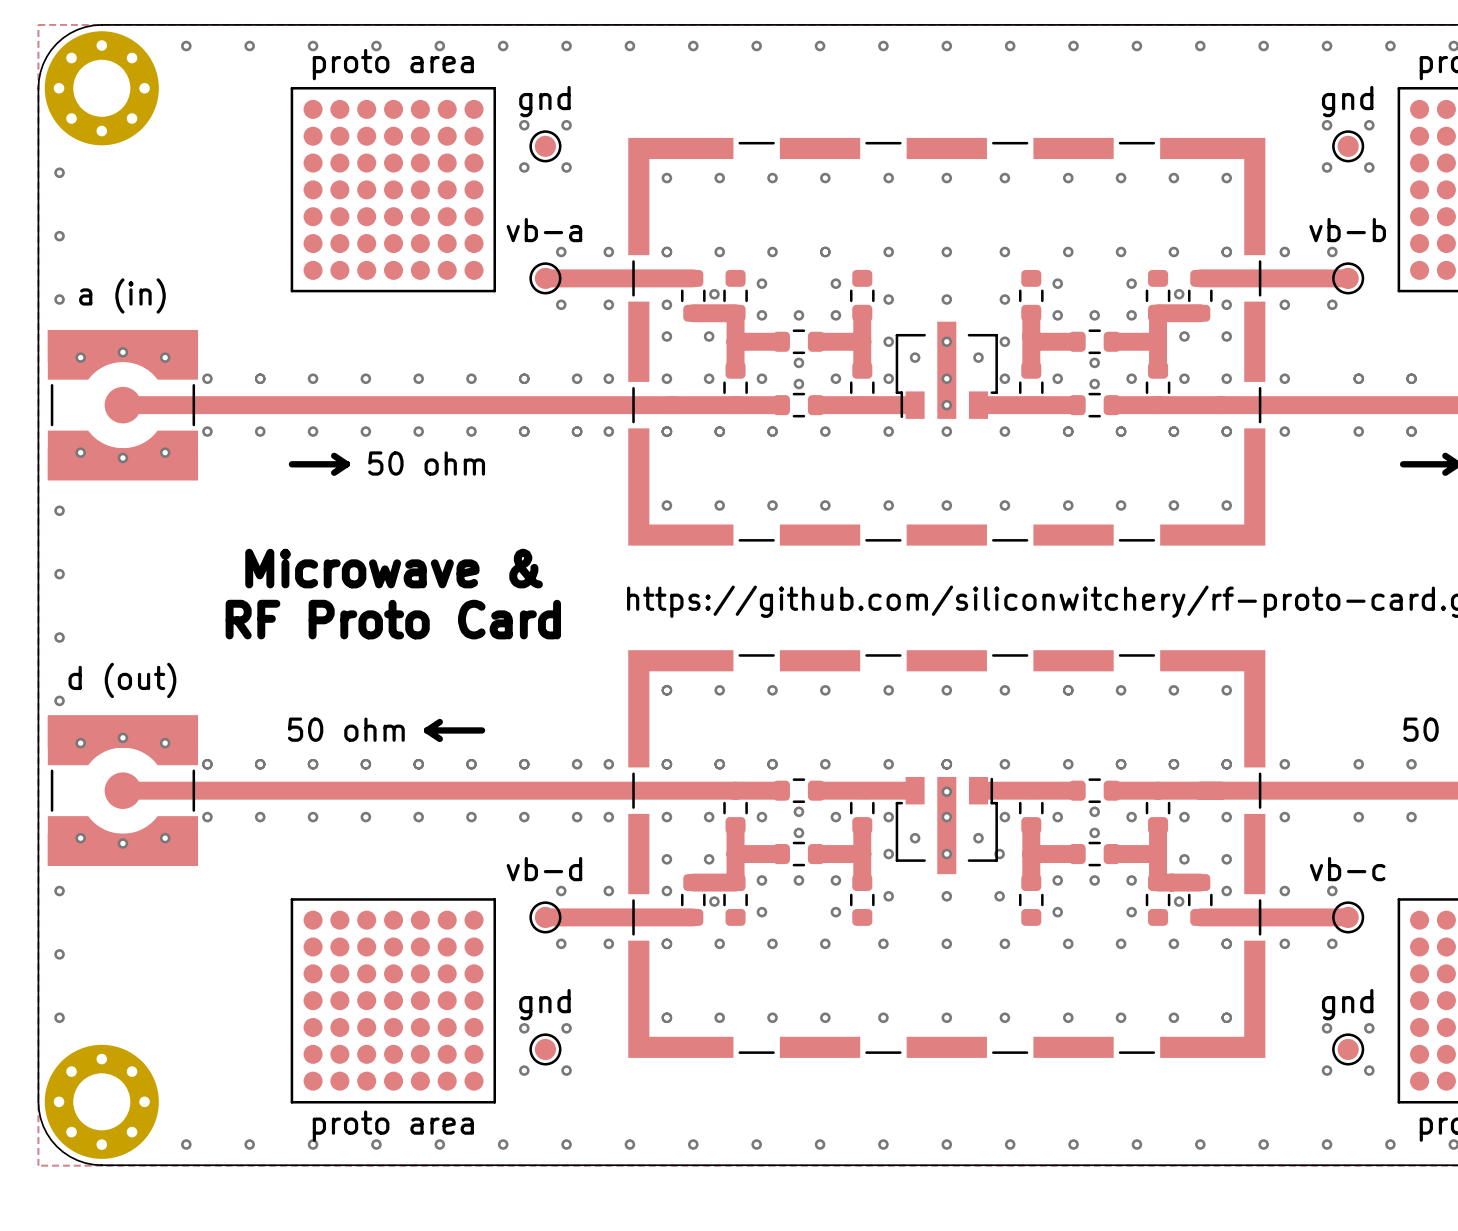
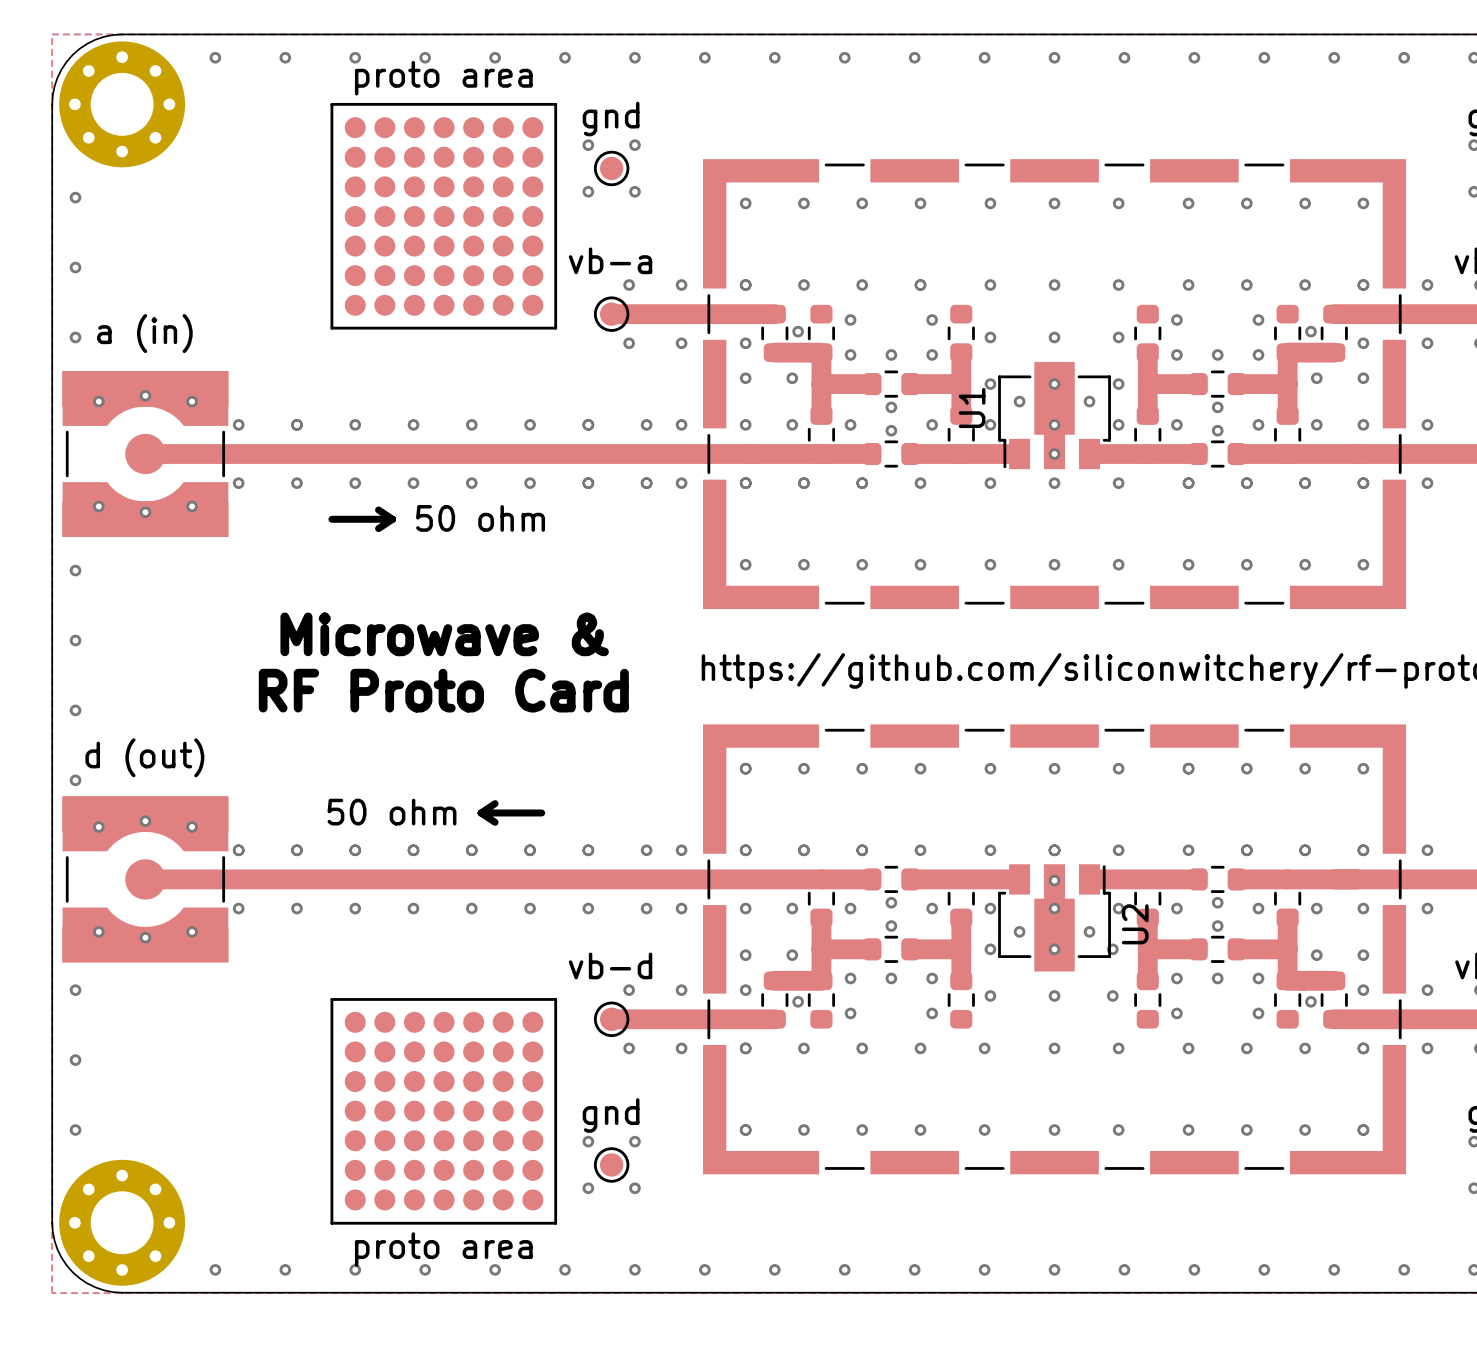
part: (946, 370) -> none
U1: none -> (1054, 415)
part: (946, 825) -> none
U2: none -> (1054, 917)

